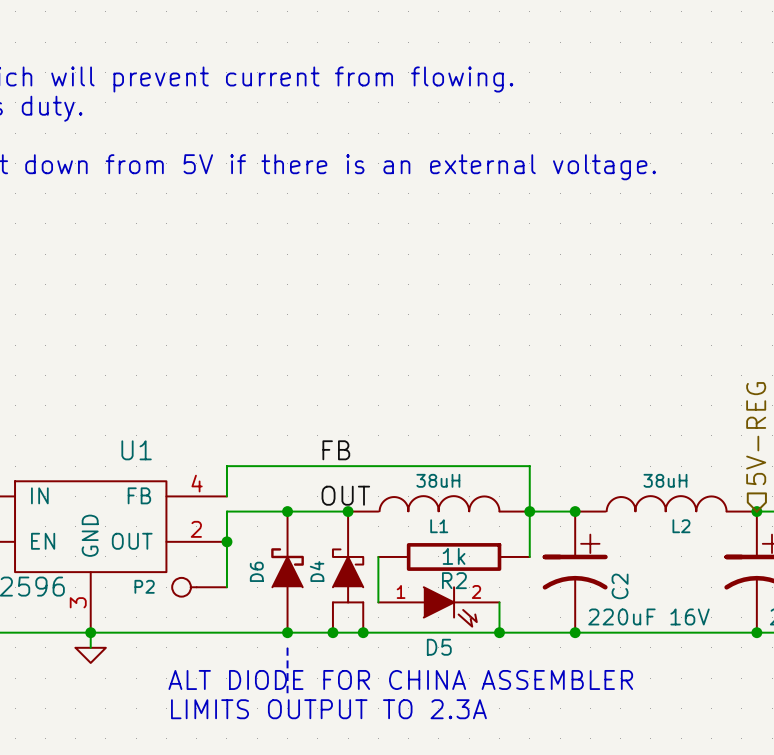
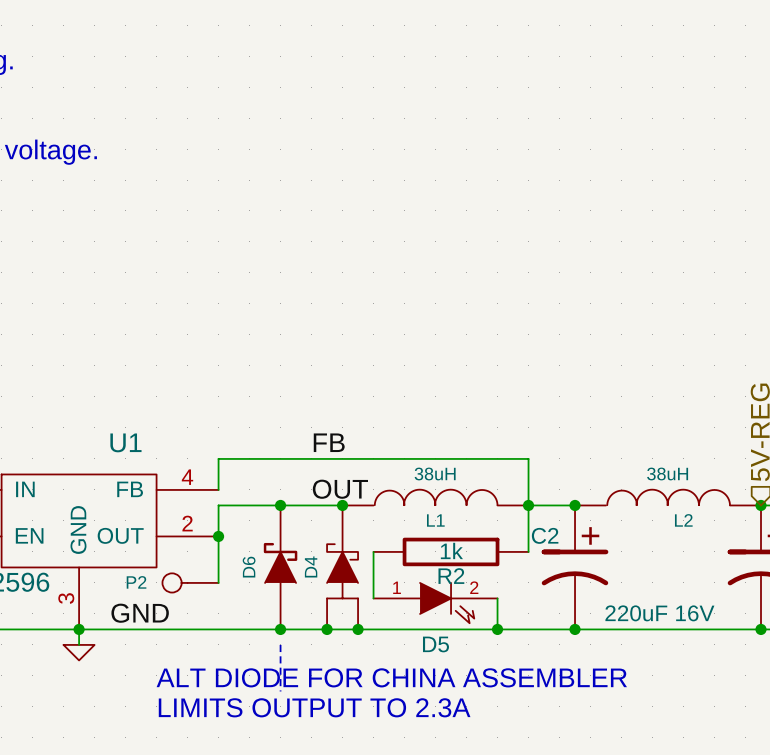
C2 name rotation: 0° (620, 586) -> 90° clockwise (545, 535)
C2 name position: C2 (620, 586) -> C2 (545, 535)
label: none -> GND (140, 613)

